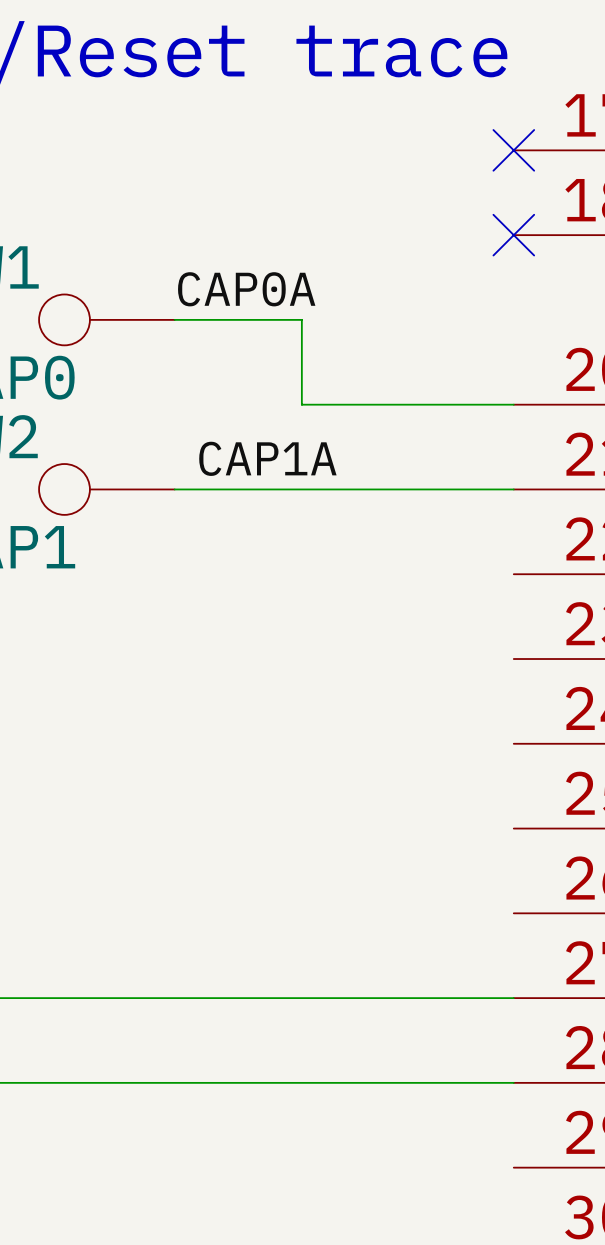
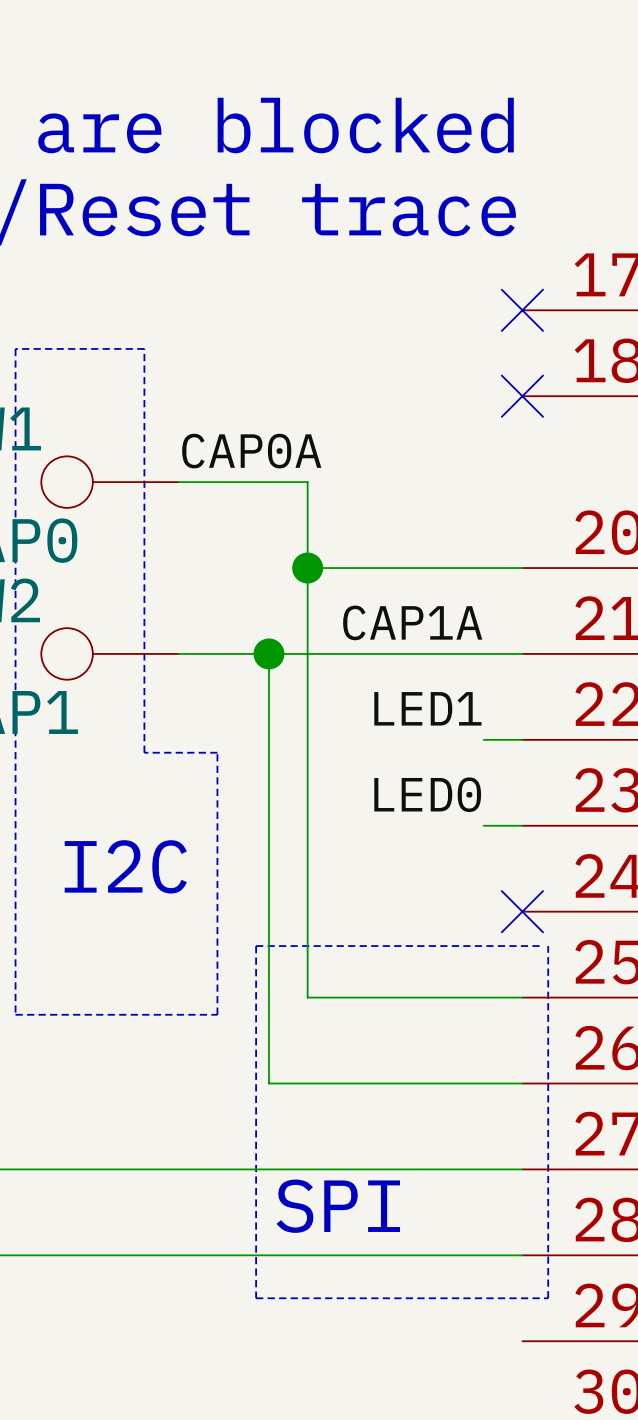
line: none -> (15, 348) (15, 1014) (217, 1014) (217, 752) (144, 752) (144, 348) (15, 348)
wire: none -> (307, 568) (307, 997) (522, 997)
junction: none -> (307, 568)
label position: CAP1A (267, 458) -> CAP1A (412, 622)
wire: none -> (268, 653) (268, 1083) (522, 1083)
junction: none -> (268, 653)
label: none -> LED1 (427, 708)
wire: none -> (483, 739) (522, 739)
label: none -> LED0 (427, 794)
wire: none -> (483, 825) (522, 825)
text: none -> I2C (125, 866)
no-connect mark: none -> (522, 911)
line: none -> (539, 946) (256, 946) (256, 1298) (548, 1298) (548, 946)
text: none -> SPI (338, 1206)

